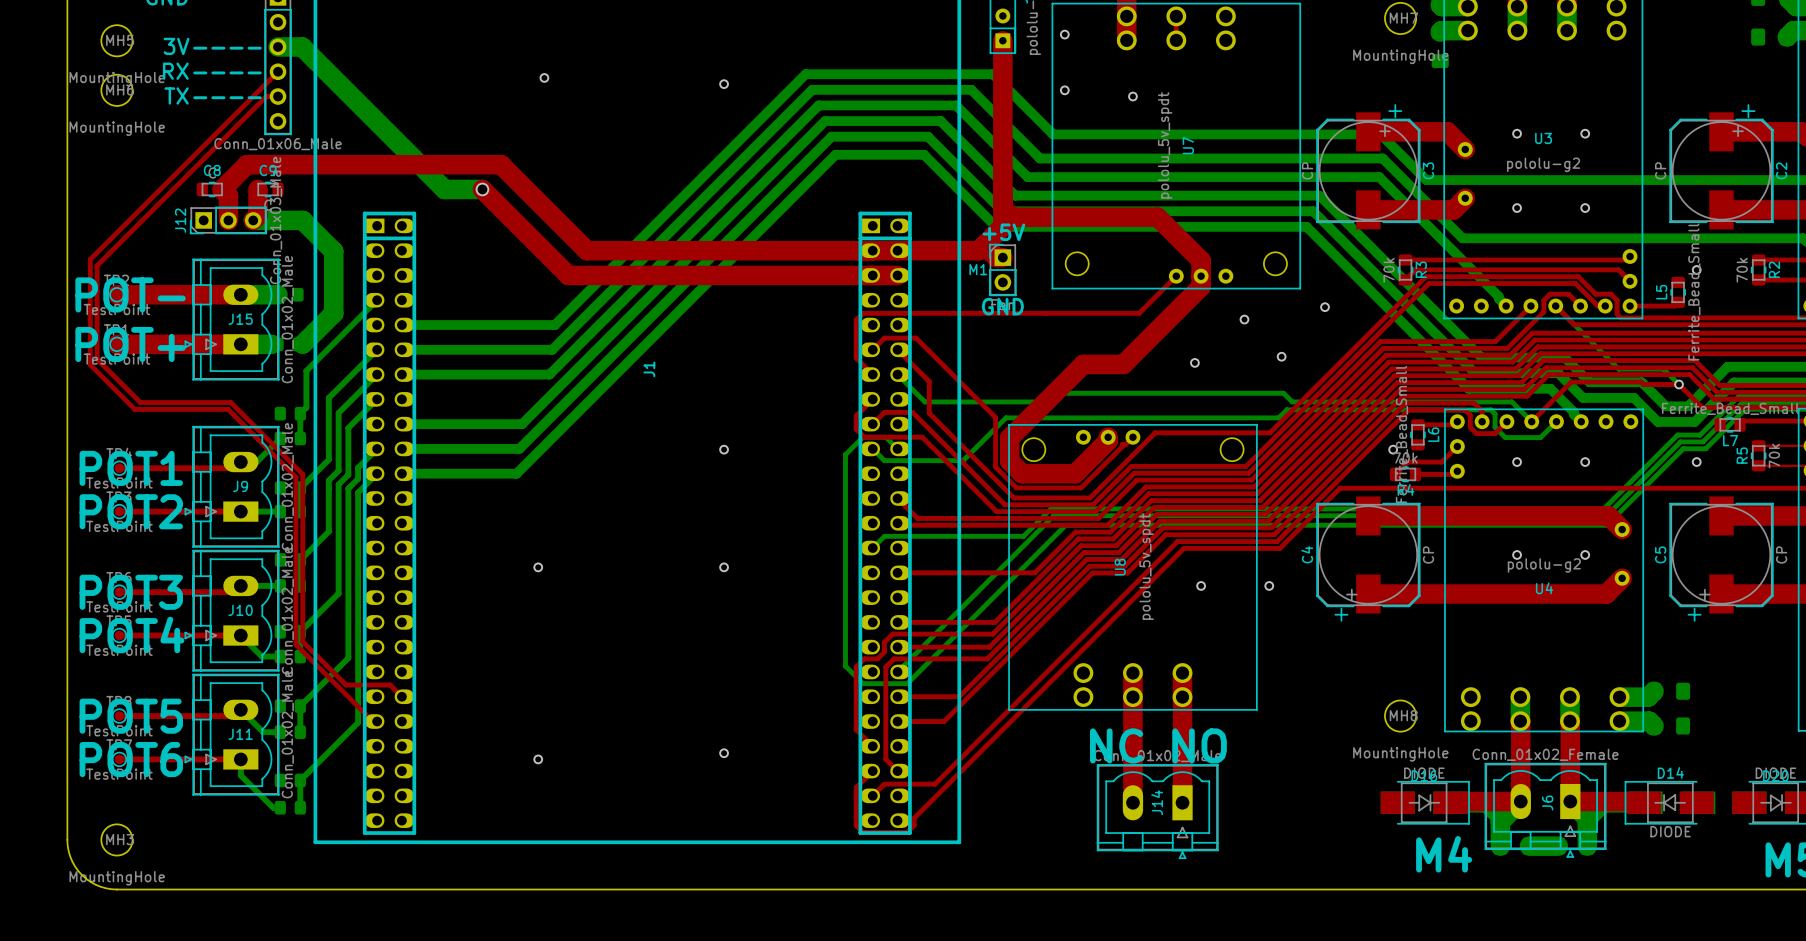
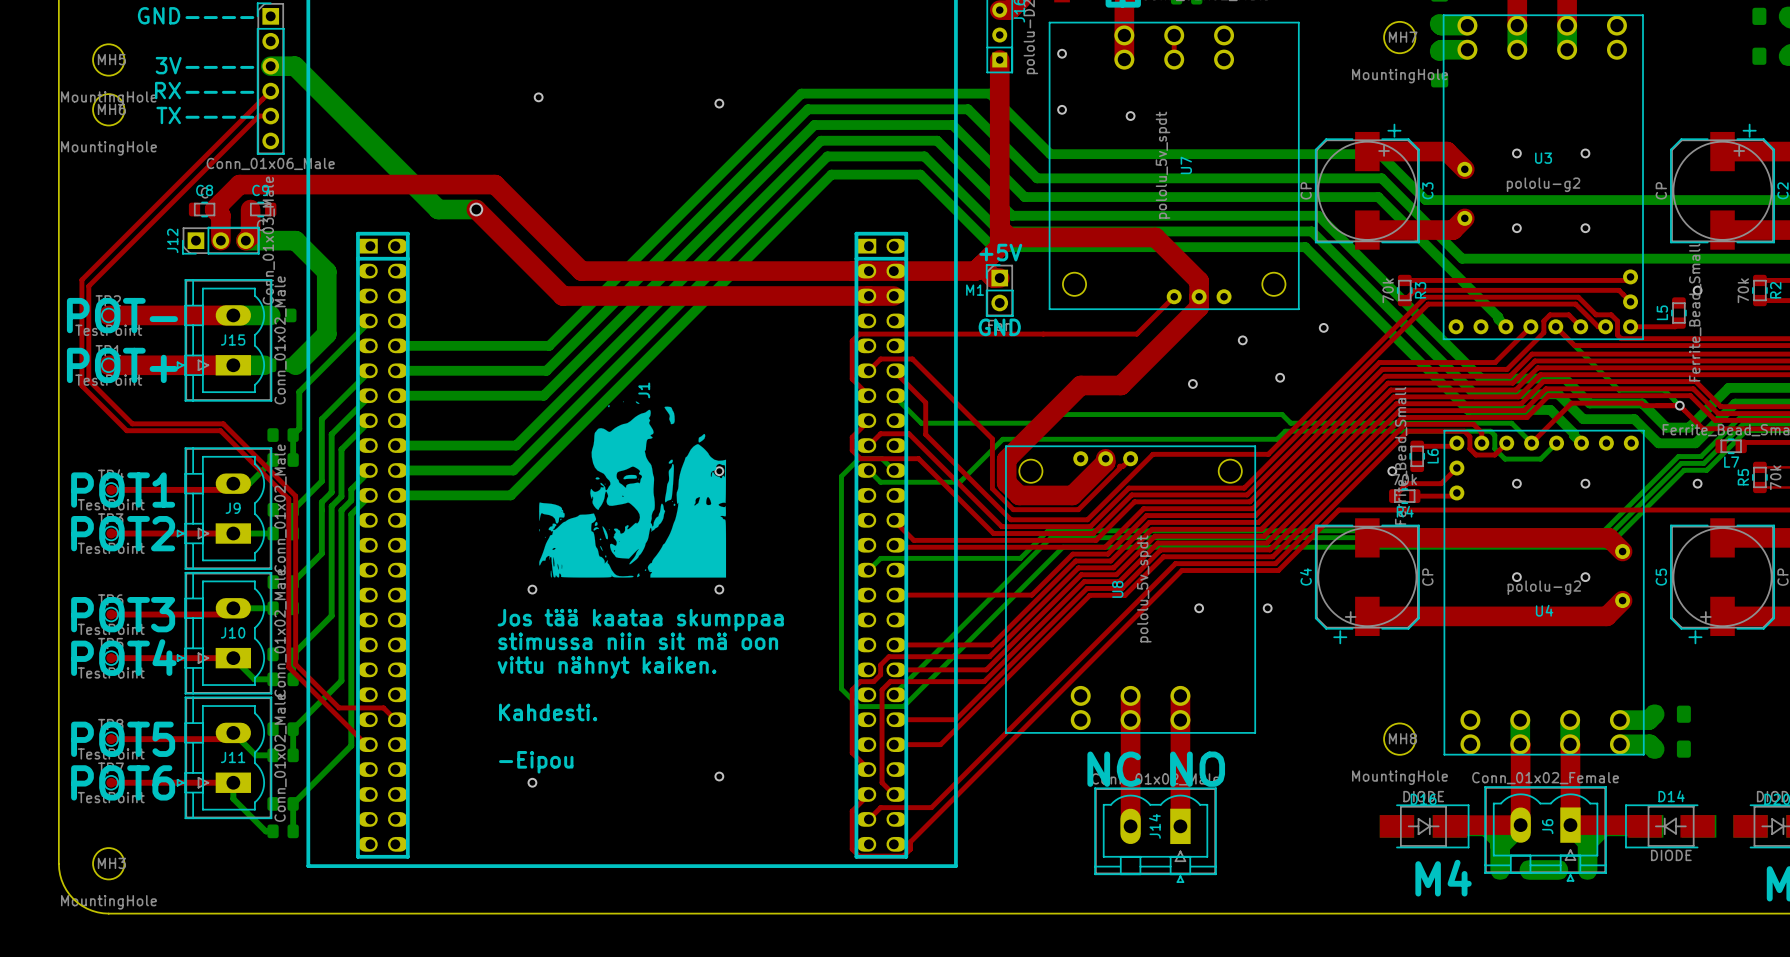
drawing: none -> [539, 401, 727, 578]
text: none -> Jos tää kaataa skumppaa (640, 620)
text: none -> stimussa niin sit mä oon (638, 641)
text: none -> vittu nähnyt kaiken. (607, 667)
text: none -> Kahdesti. (548, 712)
text: none -> -Eipou (536, 762)

